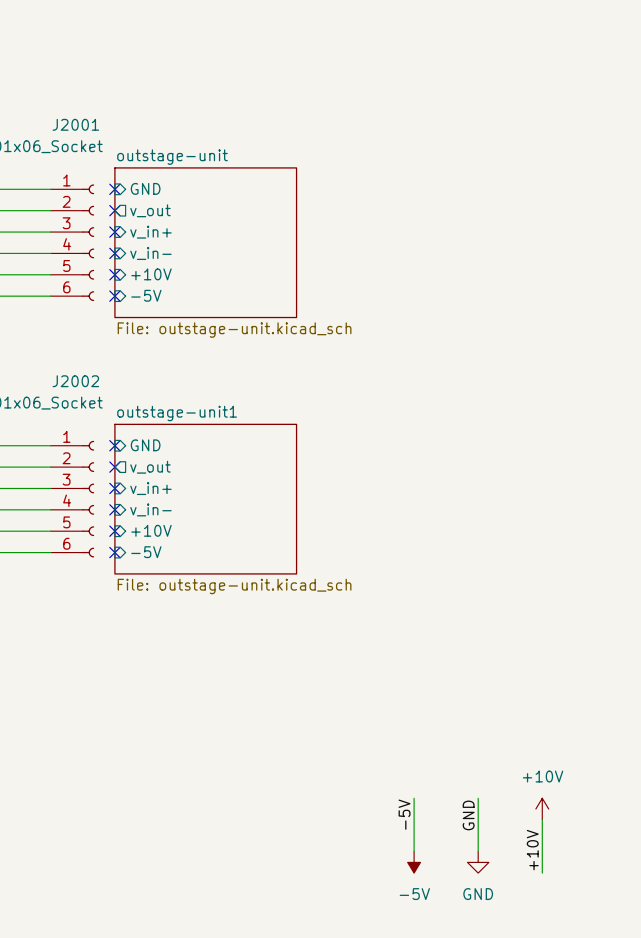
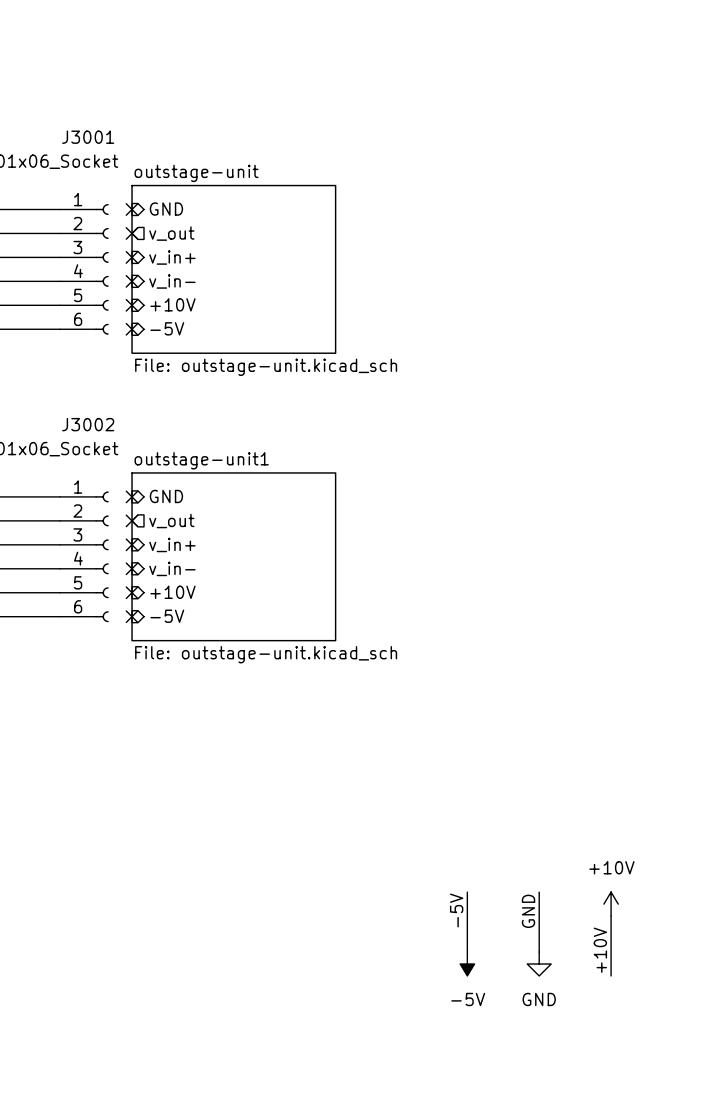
J2001 name: J2001 (75, 124) -> J3001 (88, 137)
J2002 name: J2002 (75, 381) -> J3002 (88, 424)

